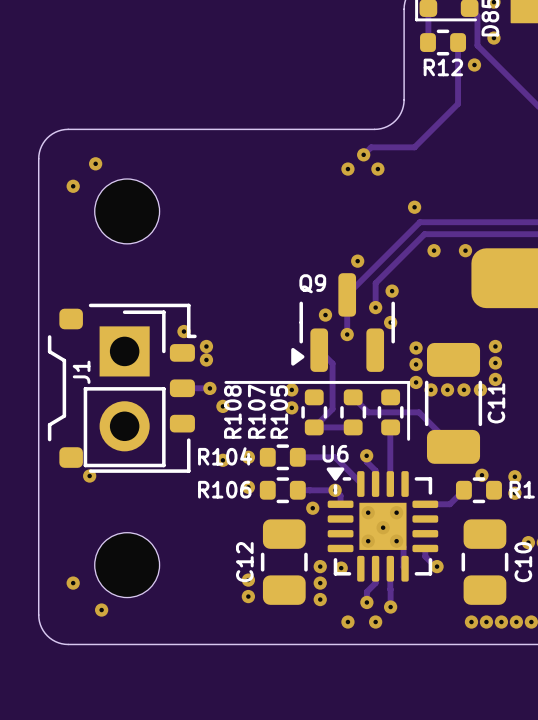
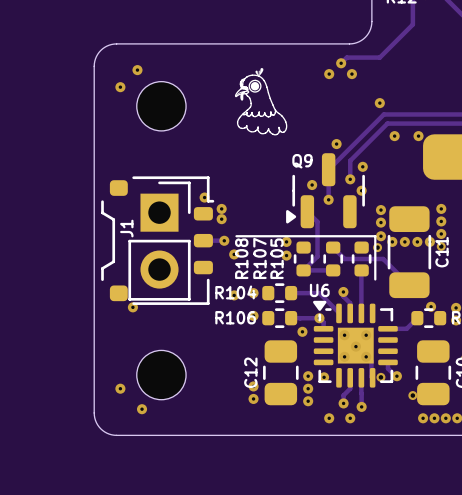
drawing: none -> [235, 68, 288, 136]
via: none -> (441, 246)
via: none -> (377, 247)
via: none -> (380, 377)
via: none -> (412, 395)

